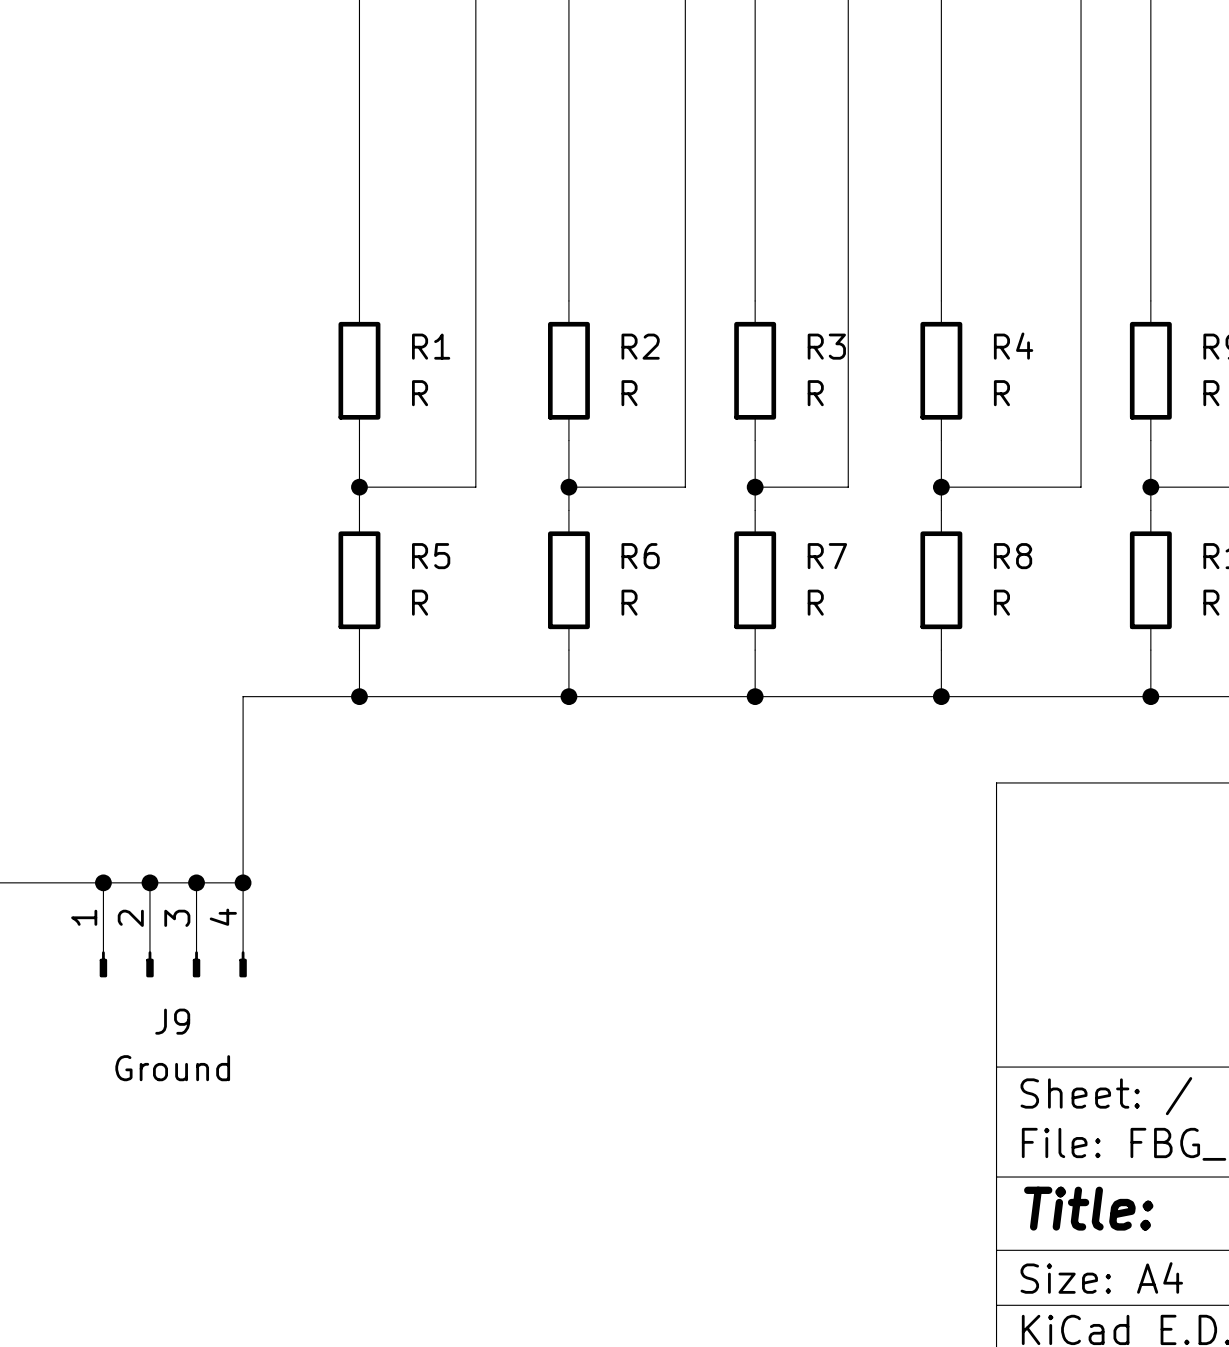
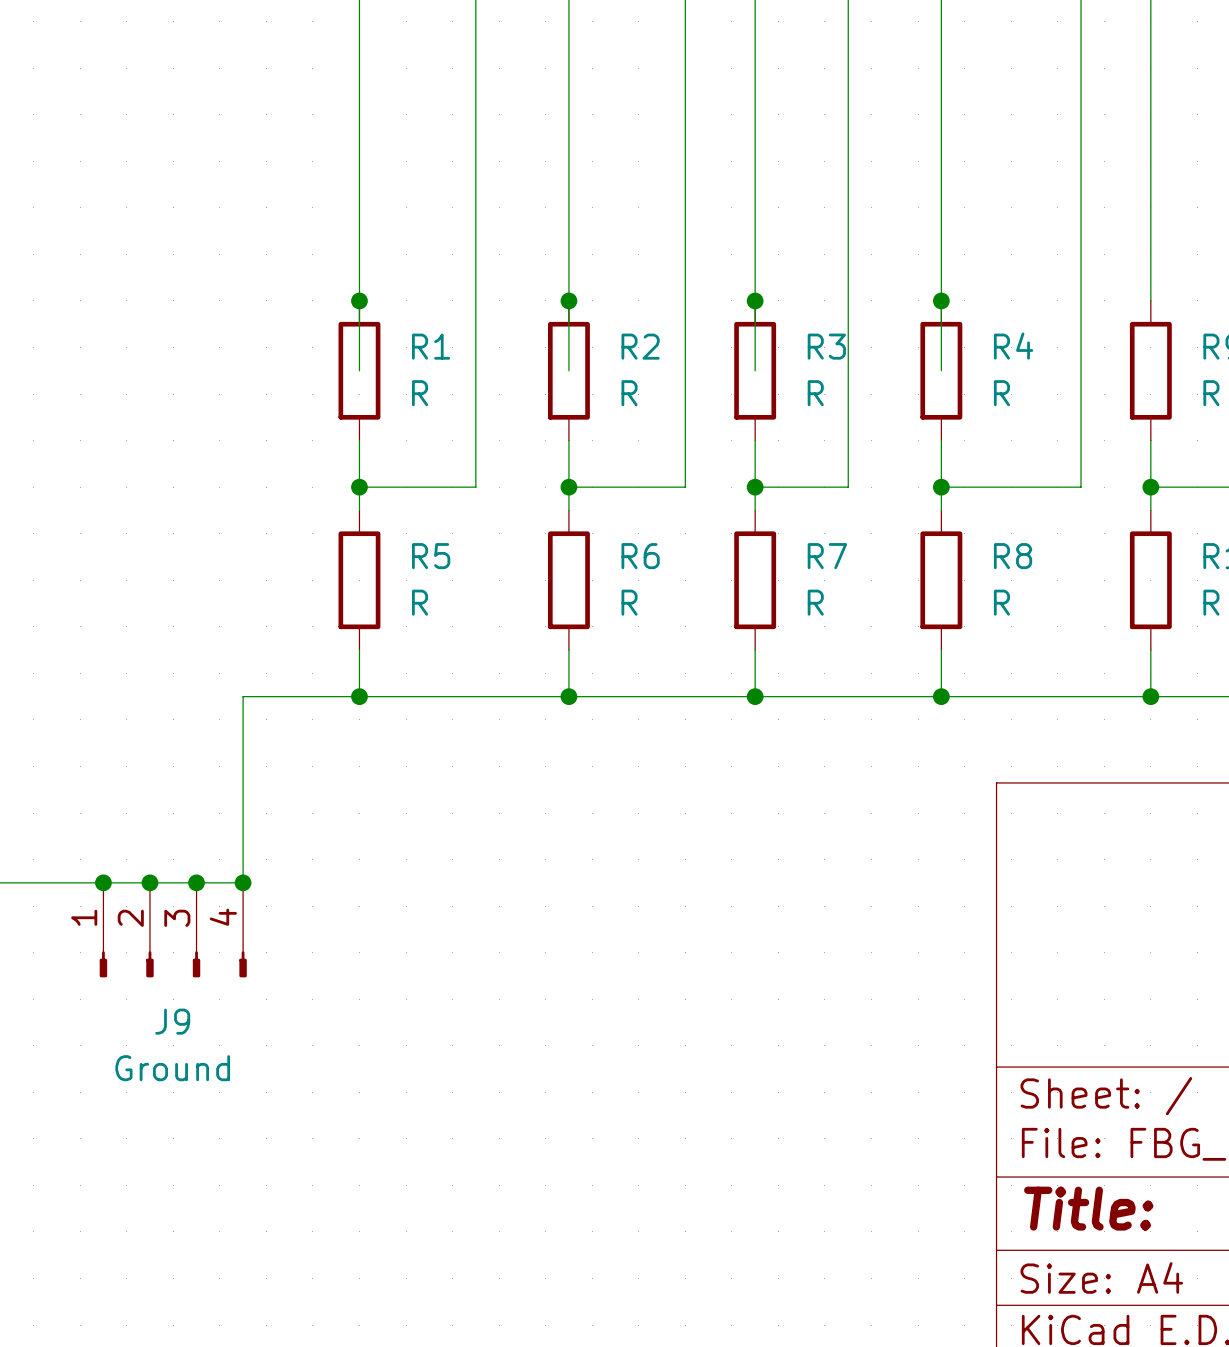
wire: none -> (359, 300) (359, 370)
junction: none -> (359, 300)
wire: none -> (568, 300) (568, 370)
junction: none -> (568, 300)
wire: none -> (755, 300) (755, 370)
junction: none -> (755, 300)
wire: none -> (941, 300) (941, 370)
junction: none -> (941, 300)

